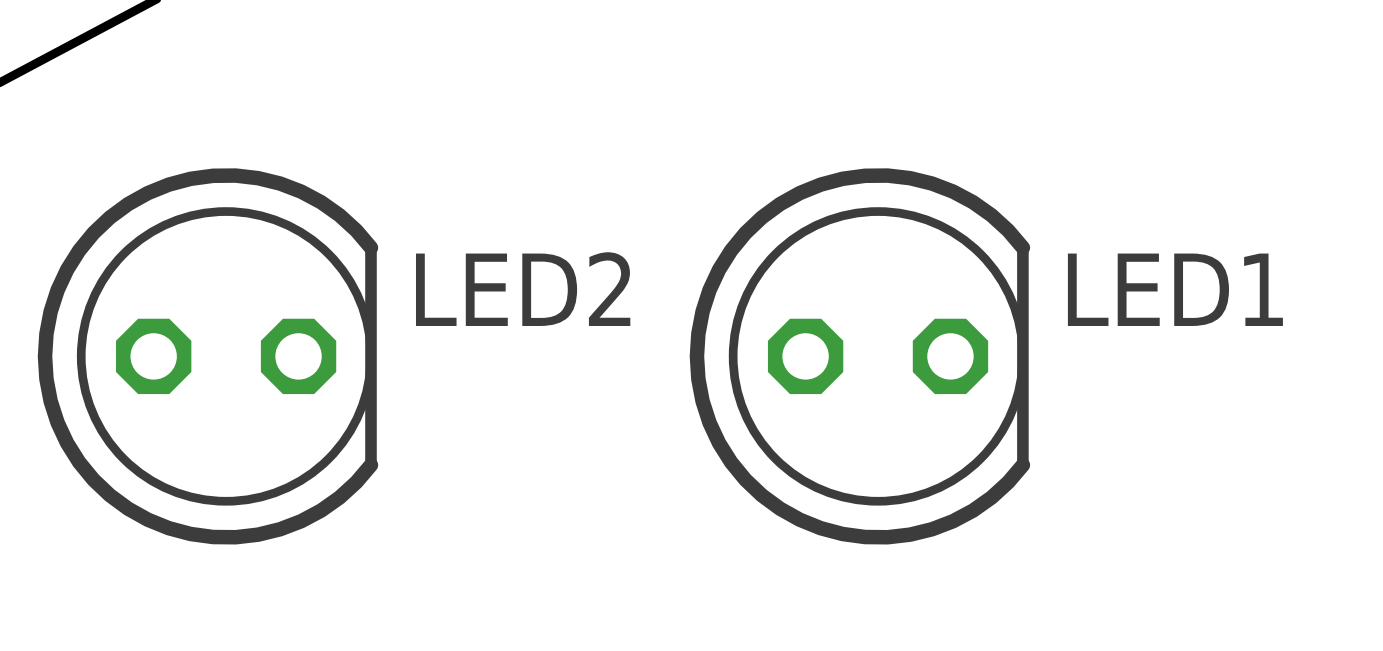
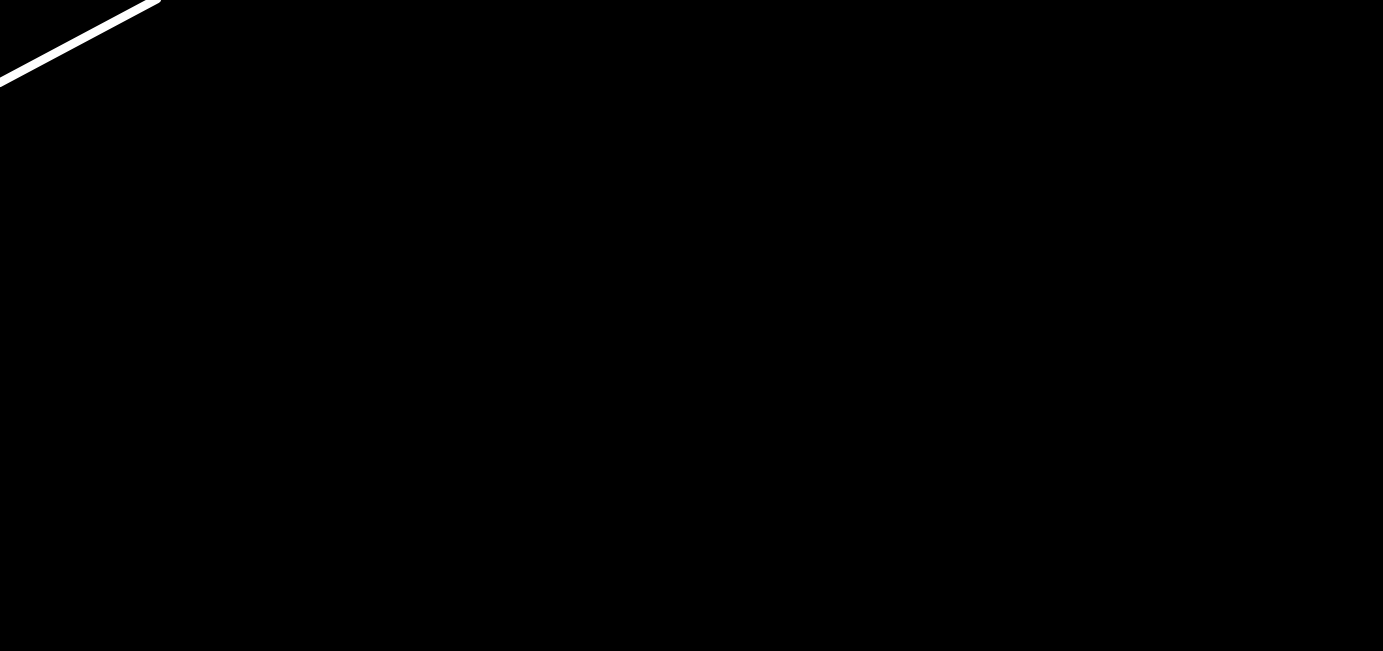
LED2: (208, 356) -> none
LED1: (859, 356) -> none

